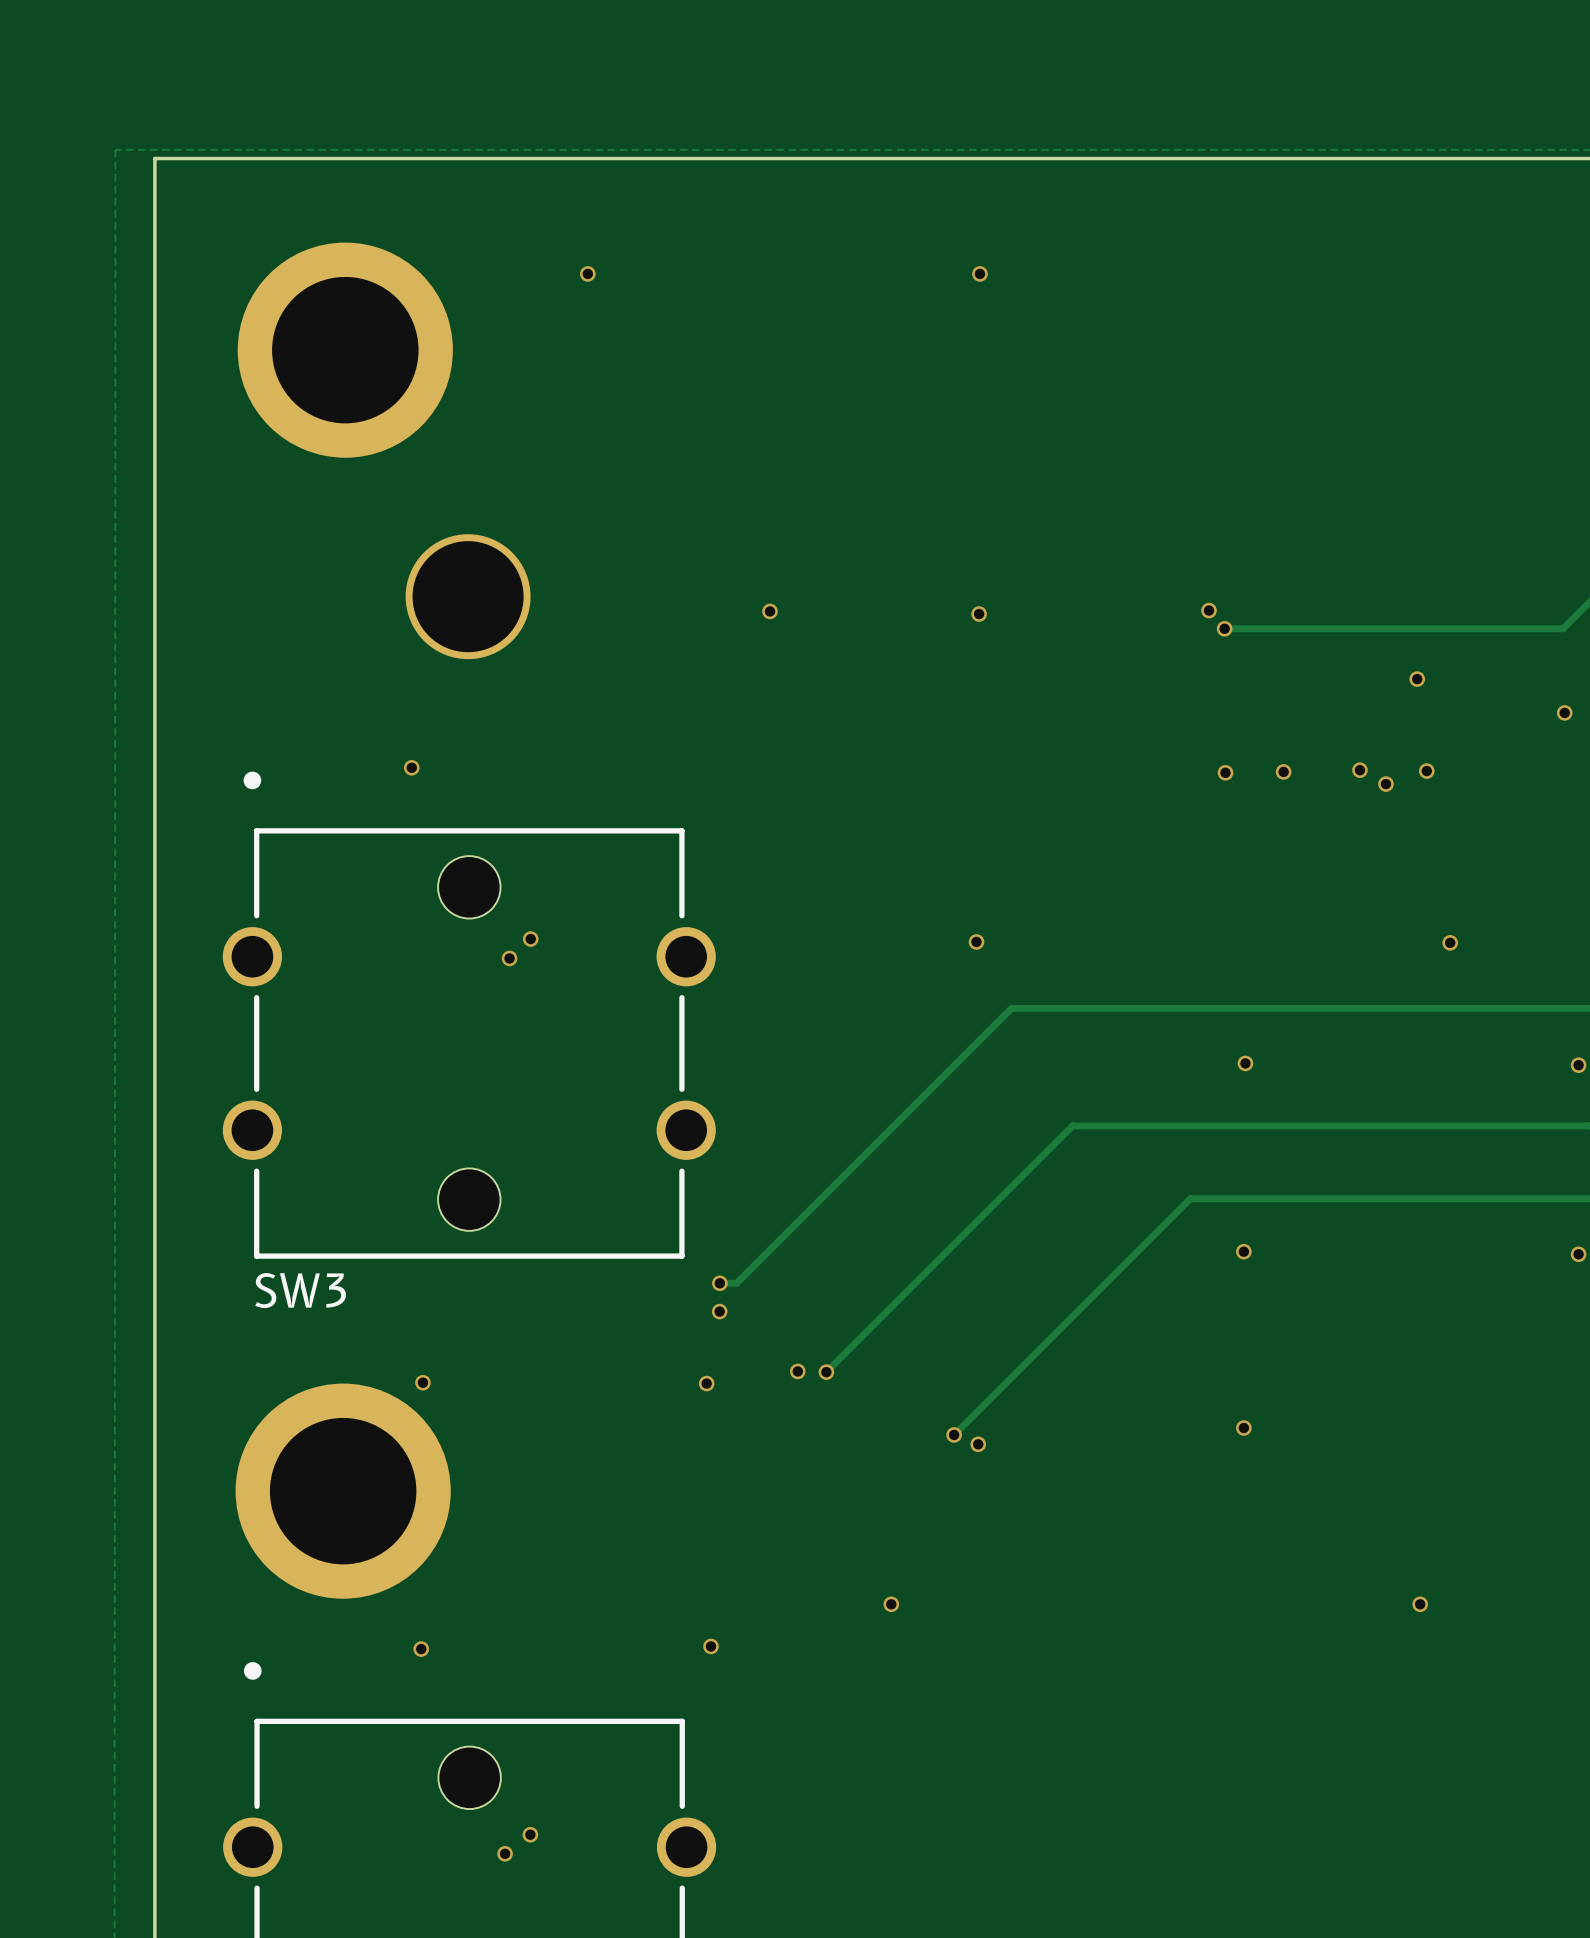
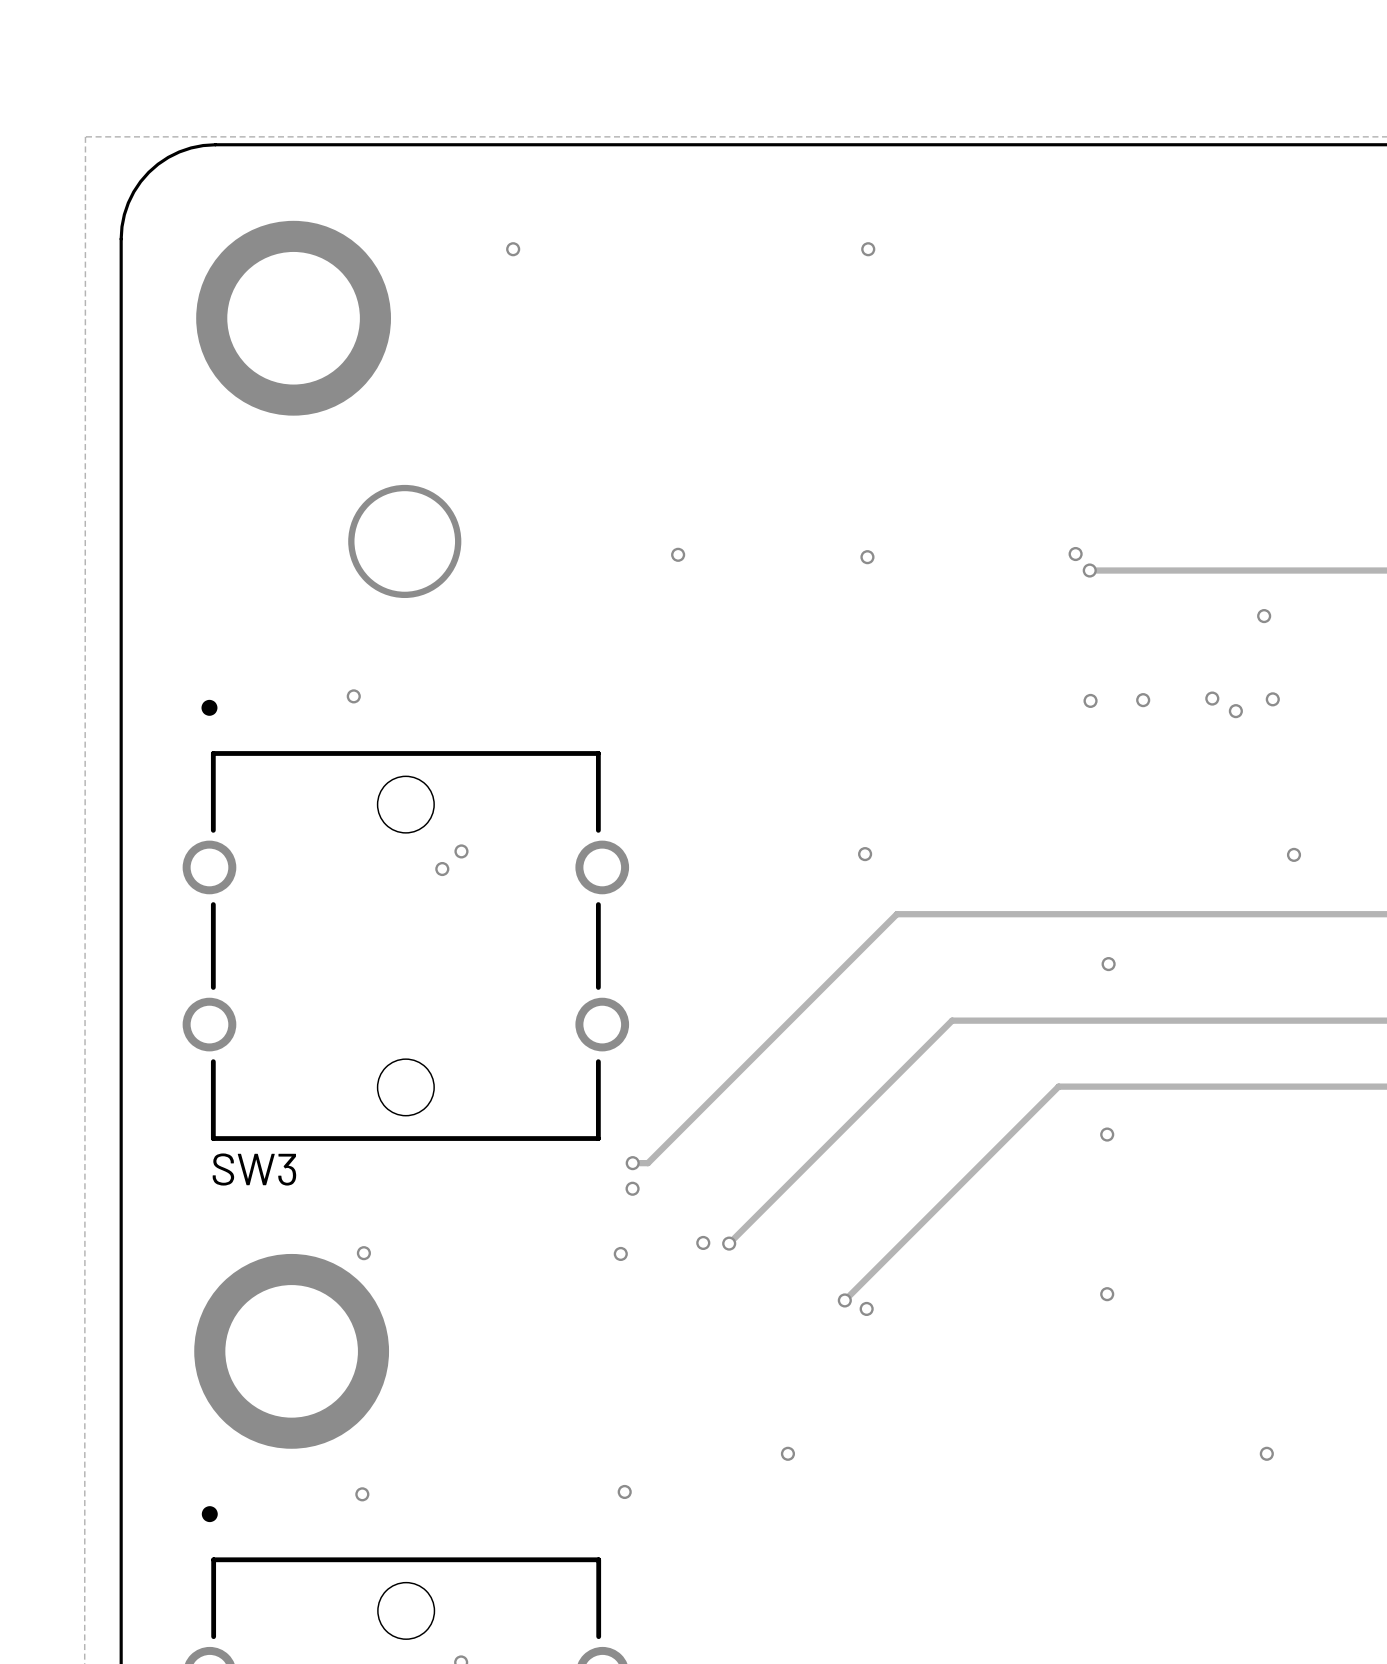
board edge: (259, 158) (154, 158) (154, 262) -> (215, 144) (203, 145) (179, 151) (158, 164) (148, 172) (140, 181) (128, 202) (121, 226) (121, 239)

